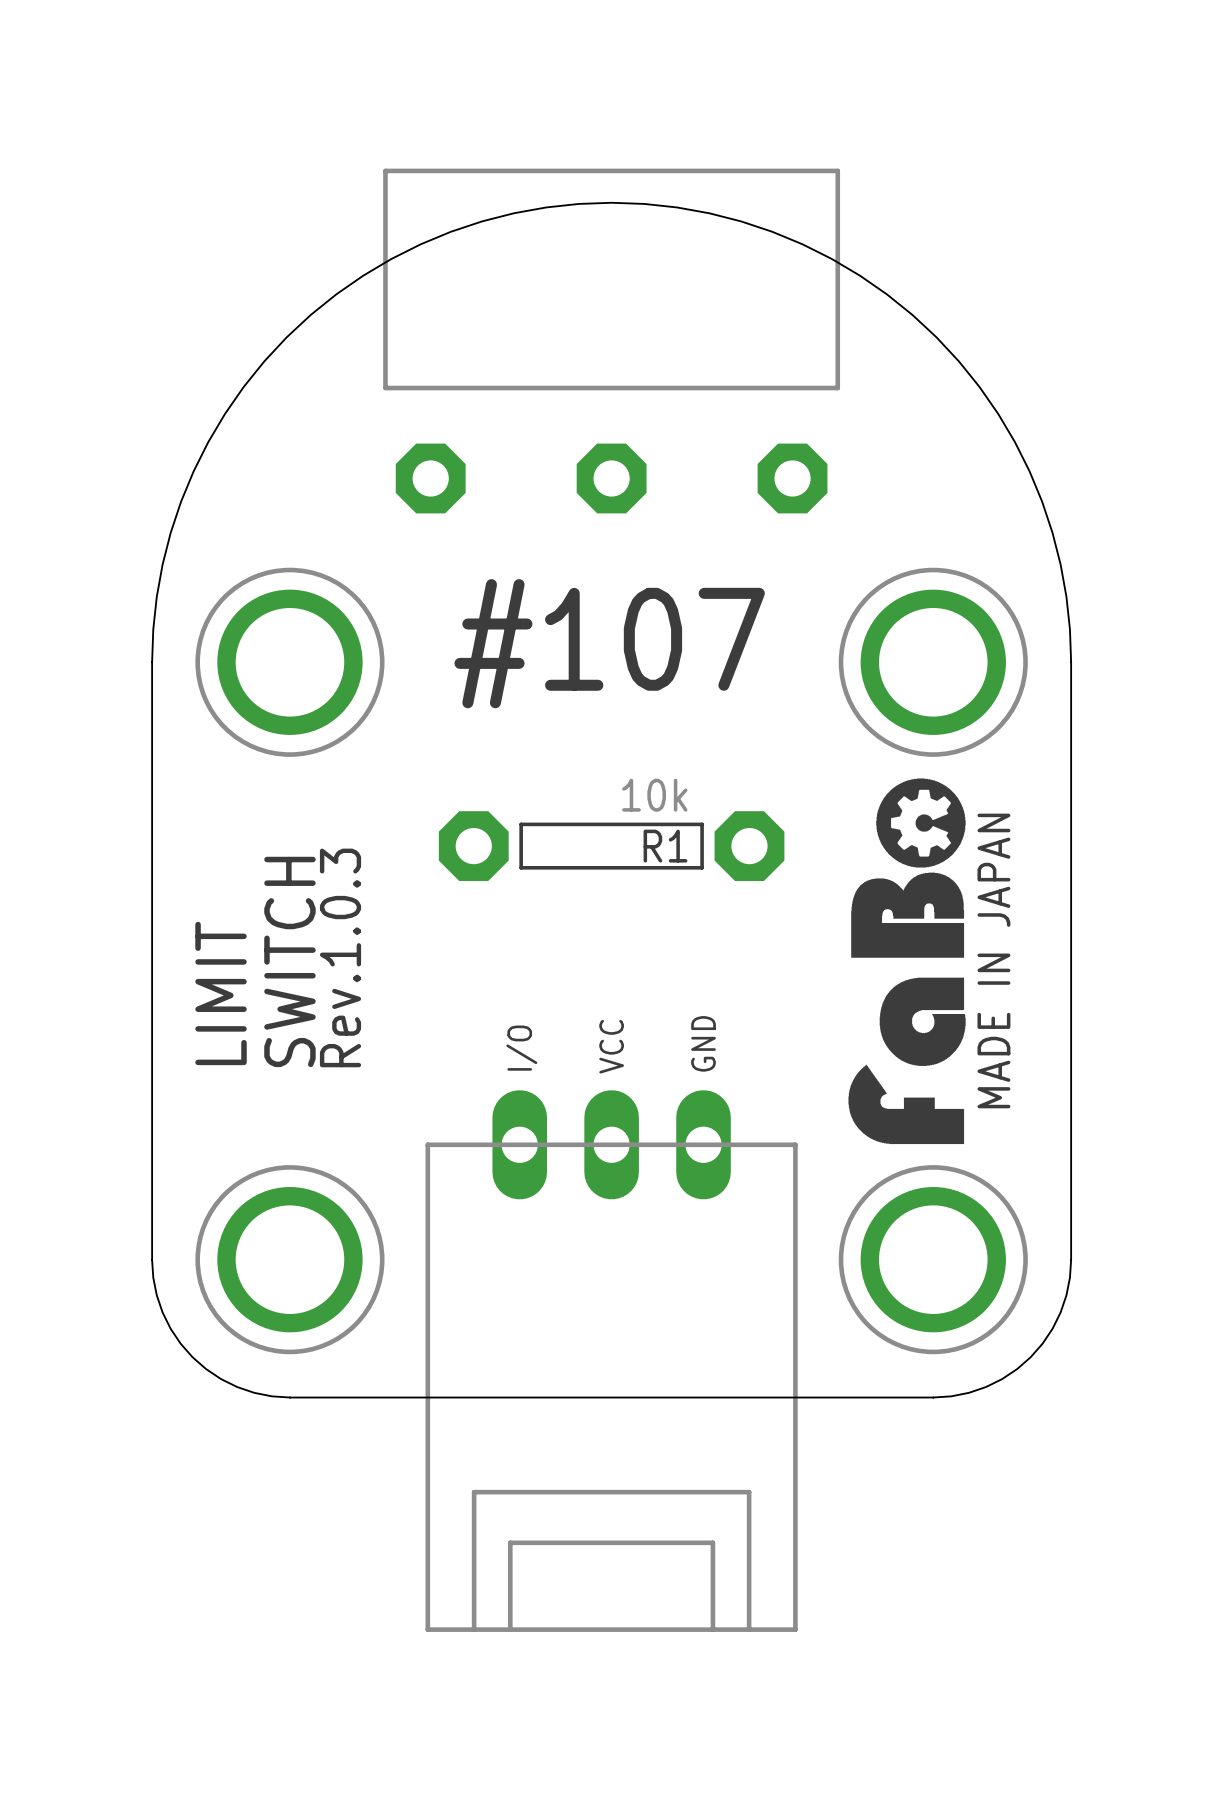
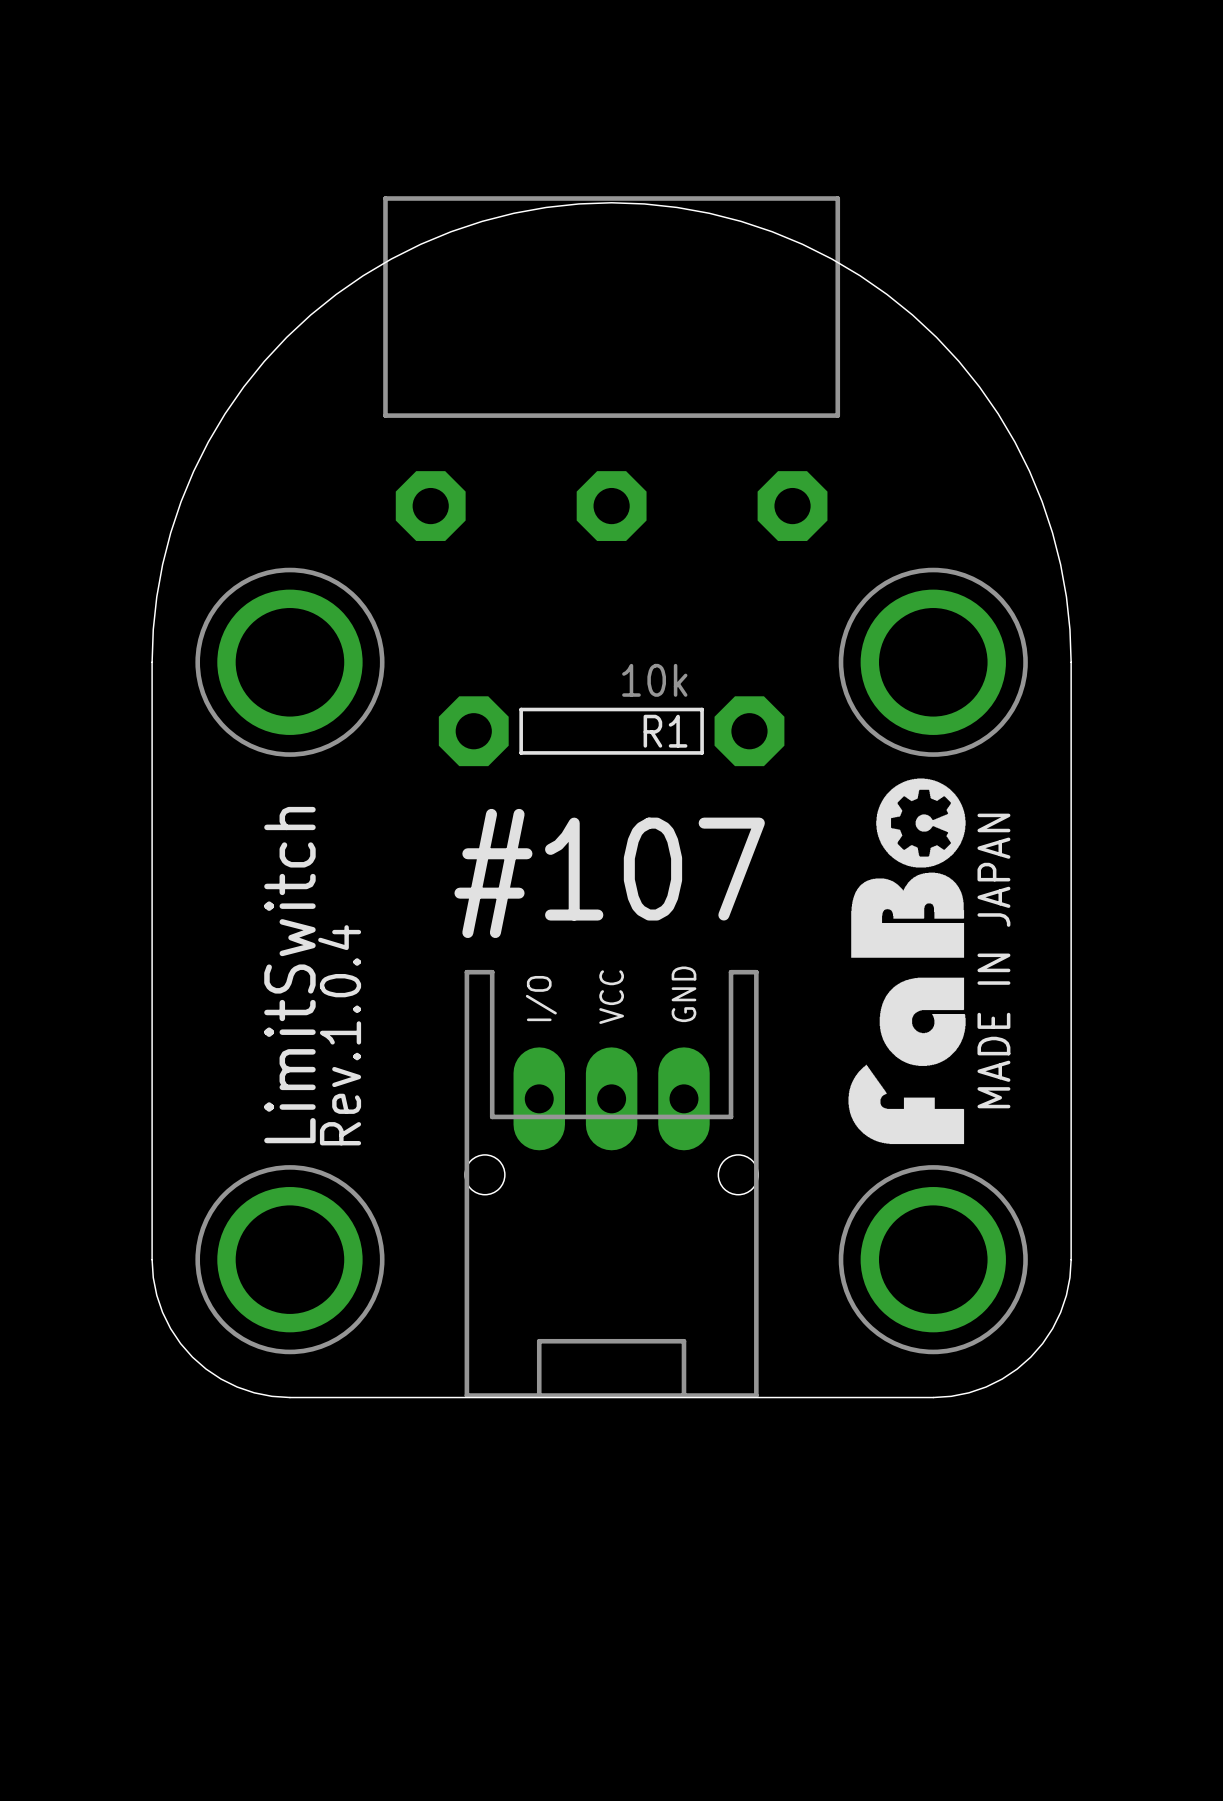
part position: (611, 341) -> (611, 368)
text position: #107 (609, 643) -> #107 (609, 873)
part: none -> (611, 800)
R1 position: (611, 846) -> (611, 731)
part: (611, 917) -> none
text: Rev.1.0.3 (340, 957) -> Rev.1.0.4 (339, 1035)
text: SWITCH (289, 961) -> none
text: none -> LimitSwitch (289, 975)
text: LIMIT (221, 993) -> none

